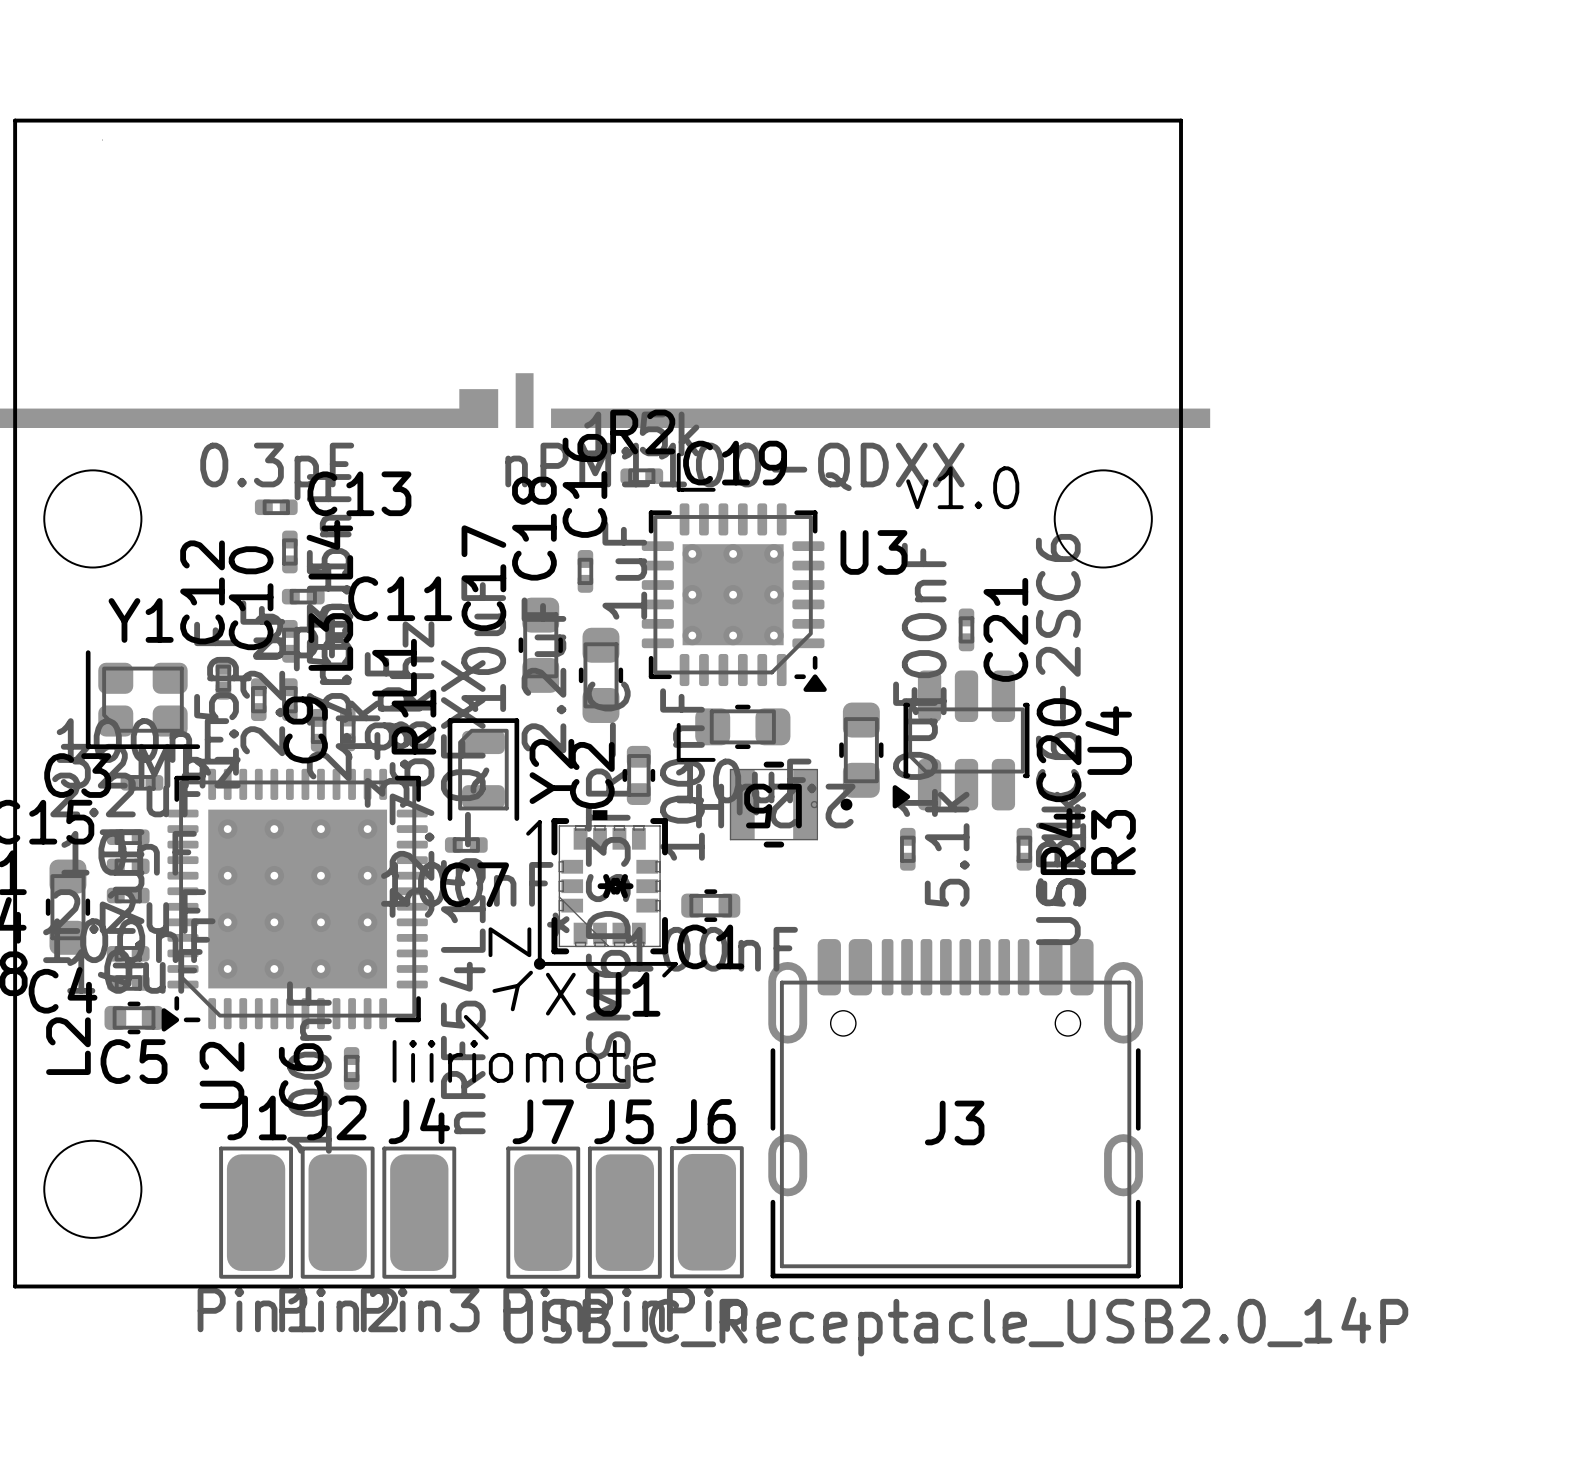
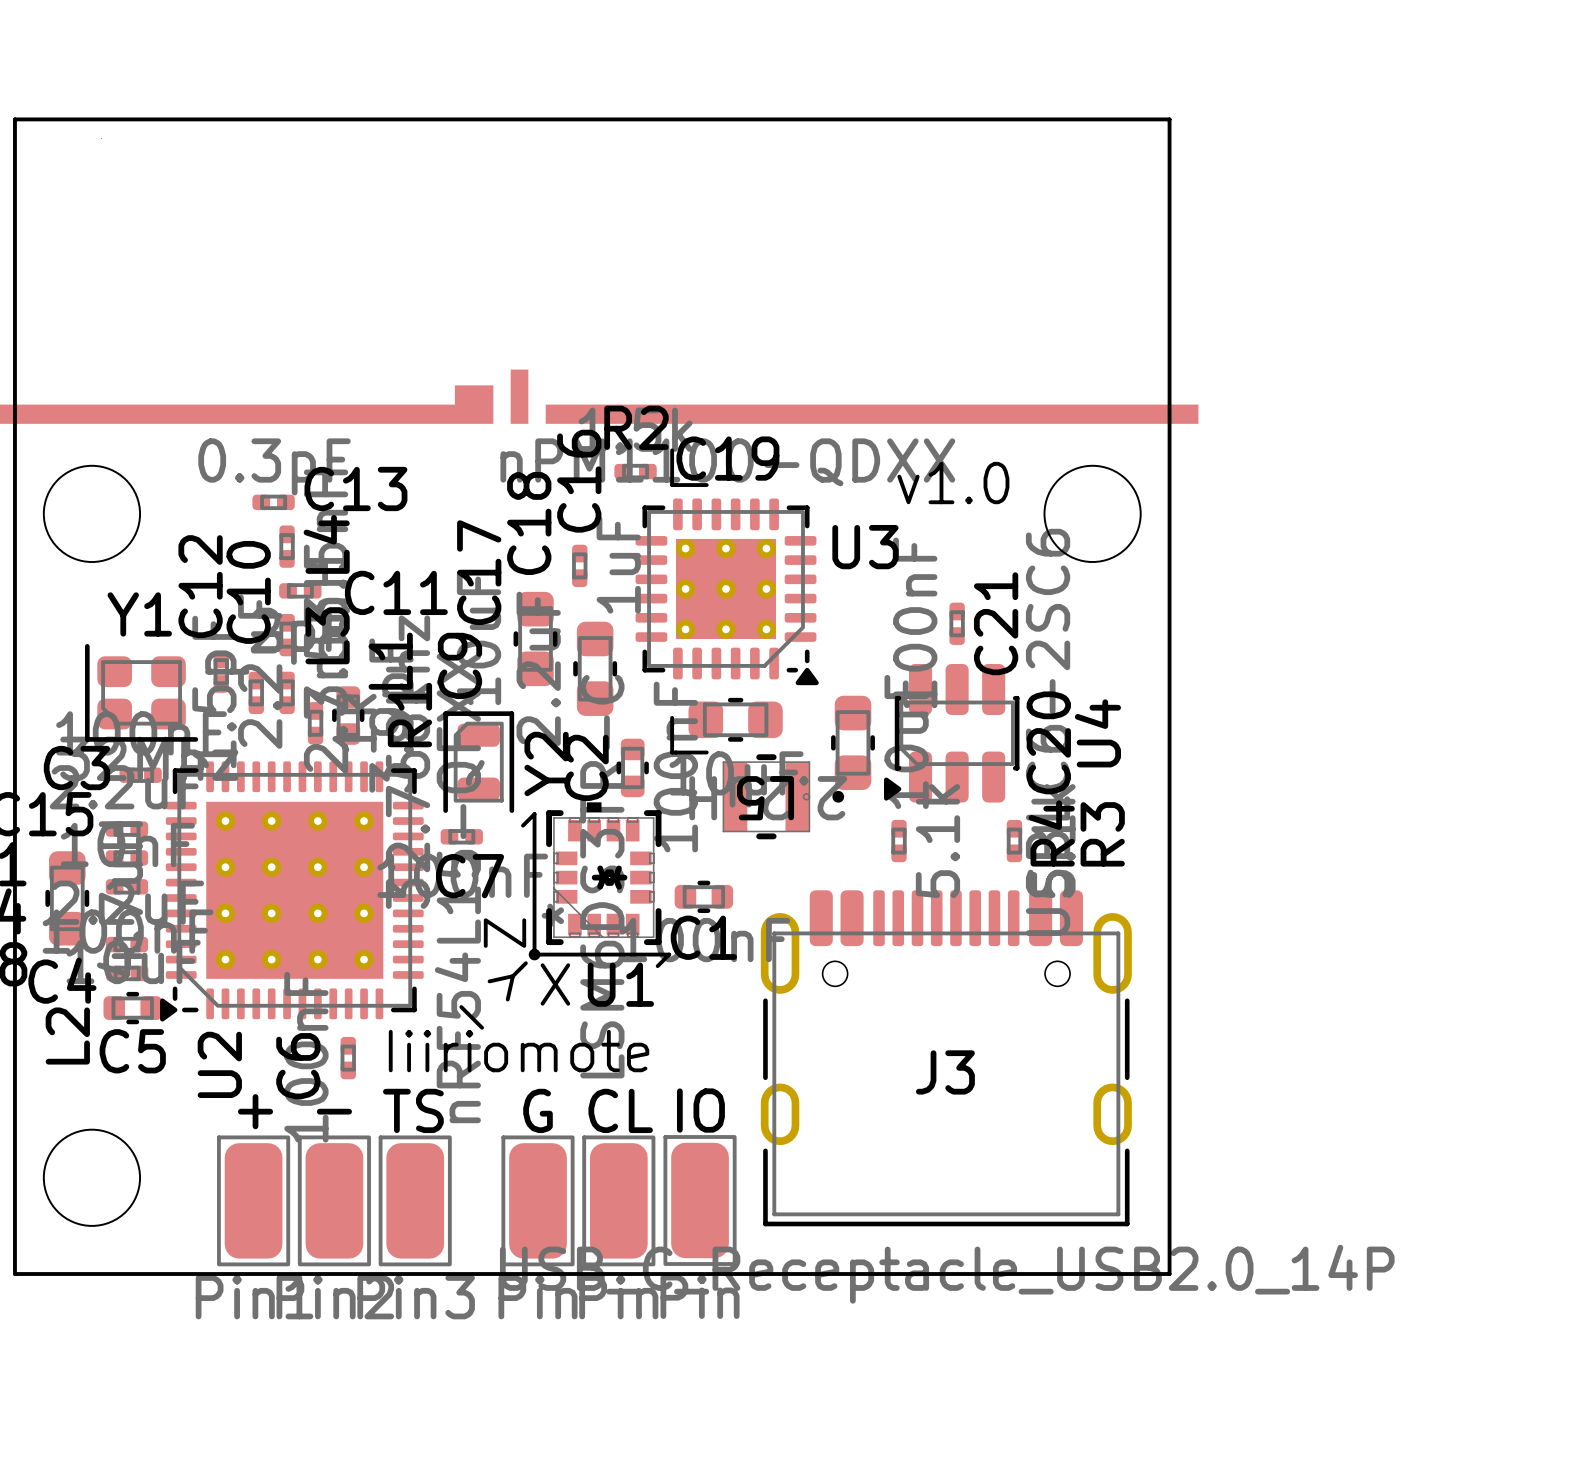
C9 footprint: [340, 708, 356, 752] -> [332, 686, 365, 745]
C9 name position: C9 (305, 729) -> C9 (459, 665)
J3 position: (955, 1108) -> (946, 1058)
J1 name: J1 (257, 1117) -> + (255, 1111)
J2 name: J2 (336, 1117) -> - (334, 1111)
J4 name: J4 (419, 1120) -> TS (413, 1110)
J7 name: J7 (543, 1121) -> G (538, 1110)
J5 name: J5 (623, 1121) -> CL (620, 1110)
J6 name: J6 (705, 1121) -> IO (700, 1110)

